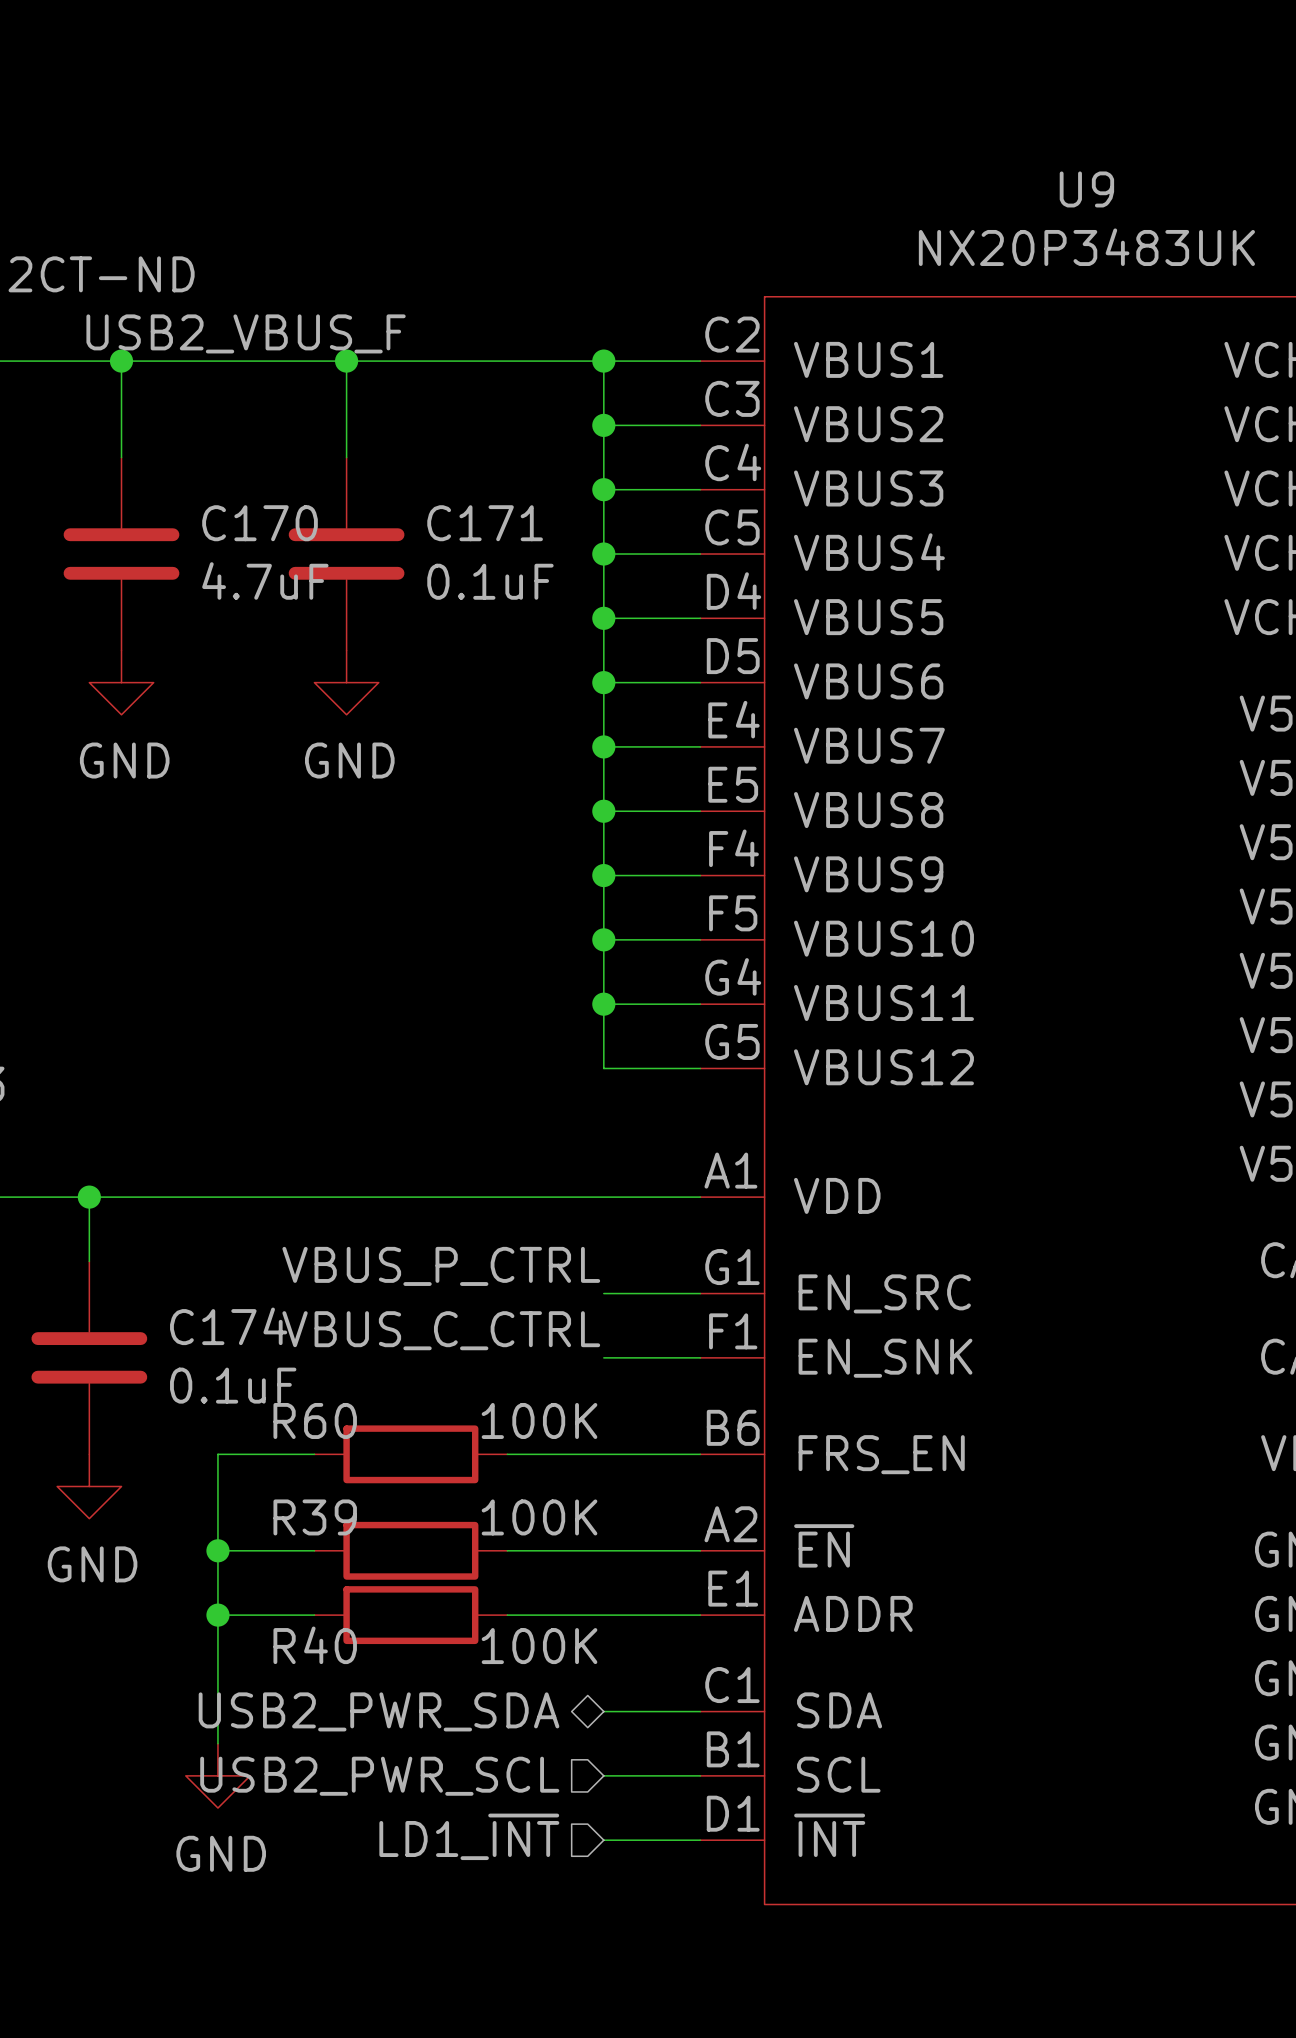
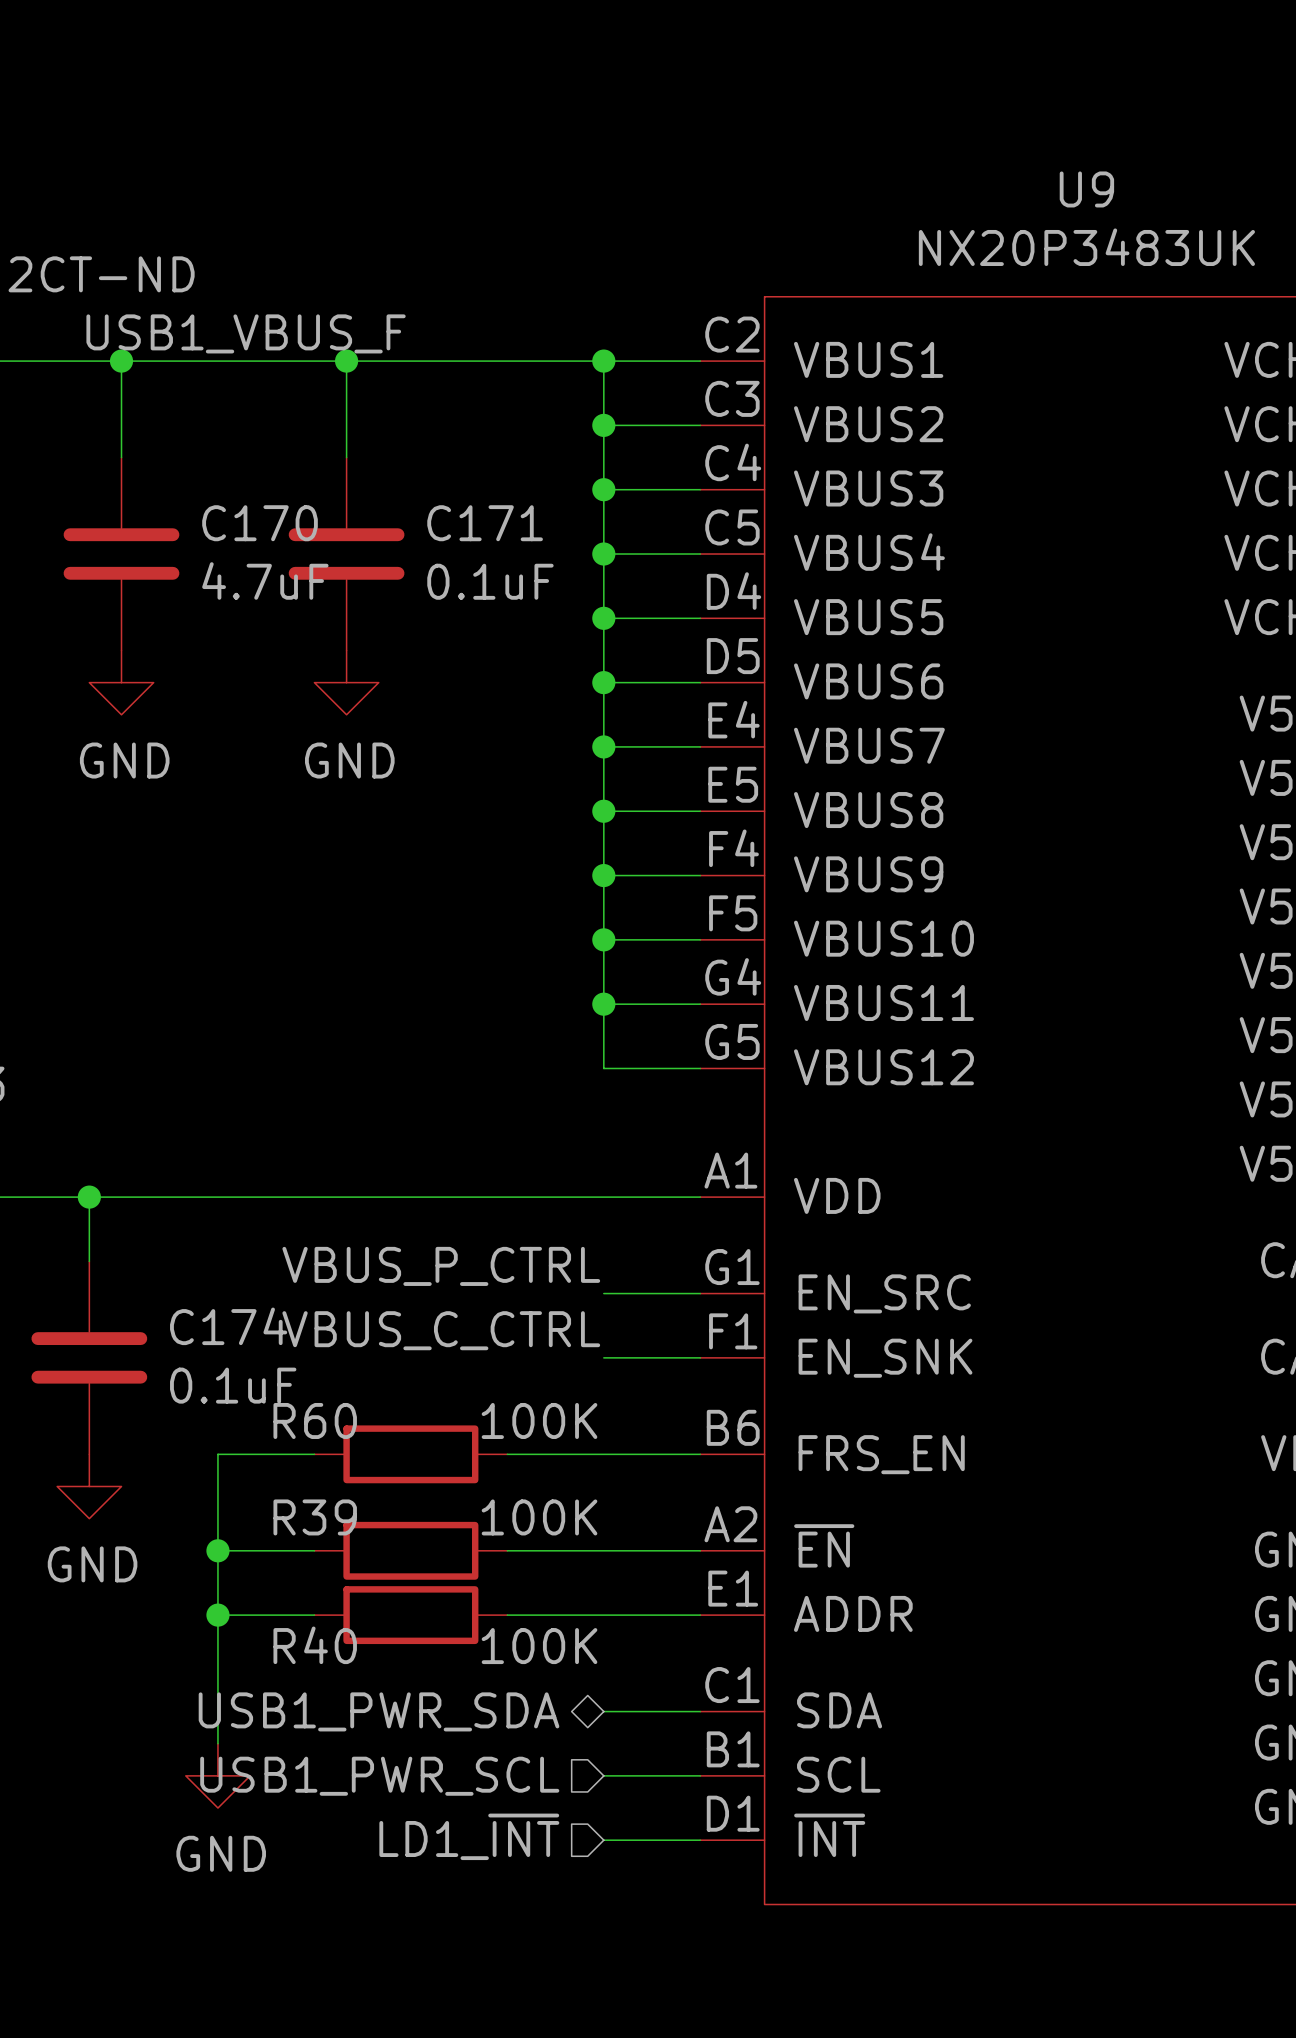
label: USB2_VBUS_F (246, 333) -> USB1_VBUS_F (246, 333)
hierarchical label: USB2_PWR_SDA (379, 1711) -> USB1_PWR_SDA (379, 1711)
hierarchical label: USB2_PWR_SCL (379, 1776) -> USB1_PWR_SCL (379, 1776)

